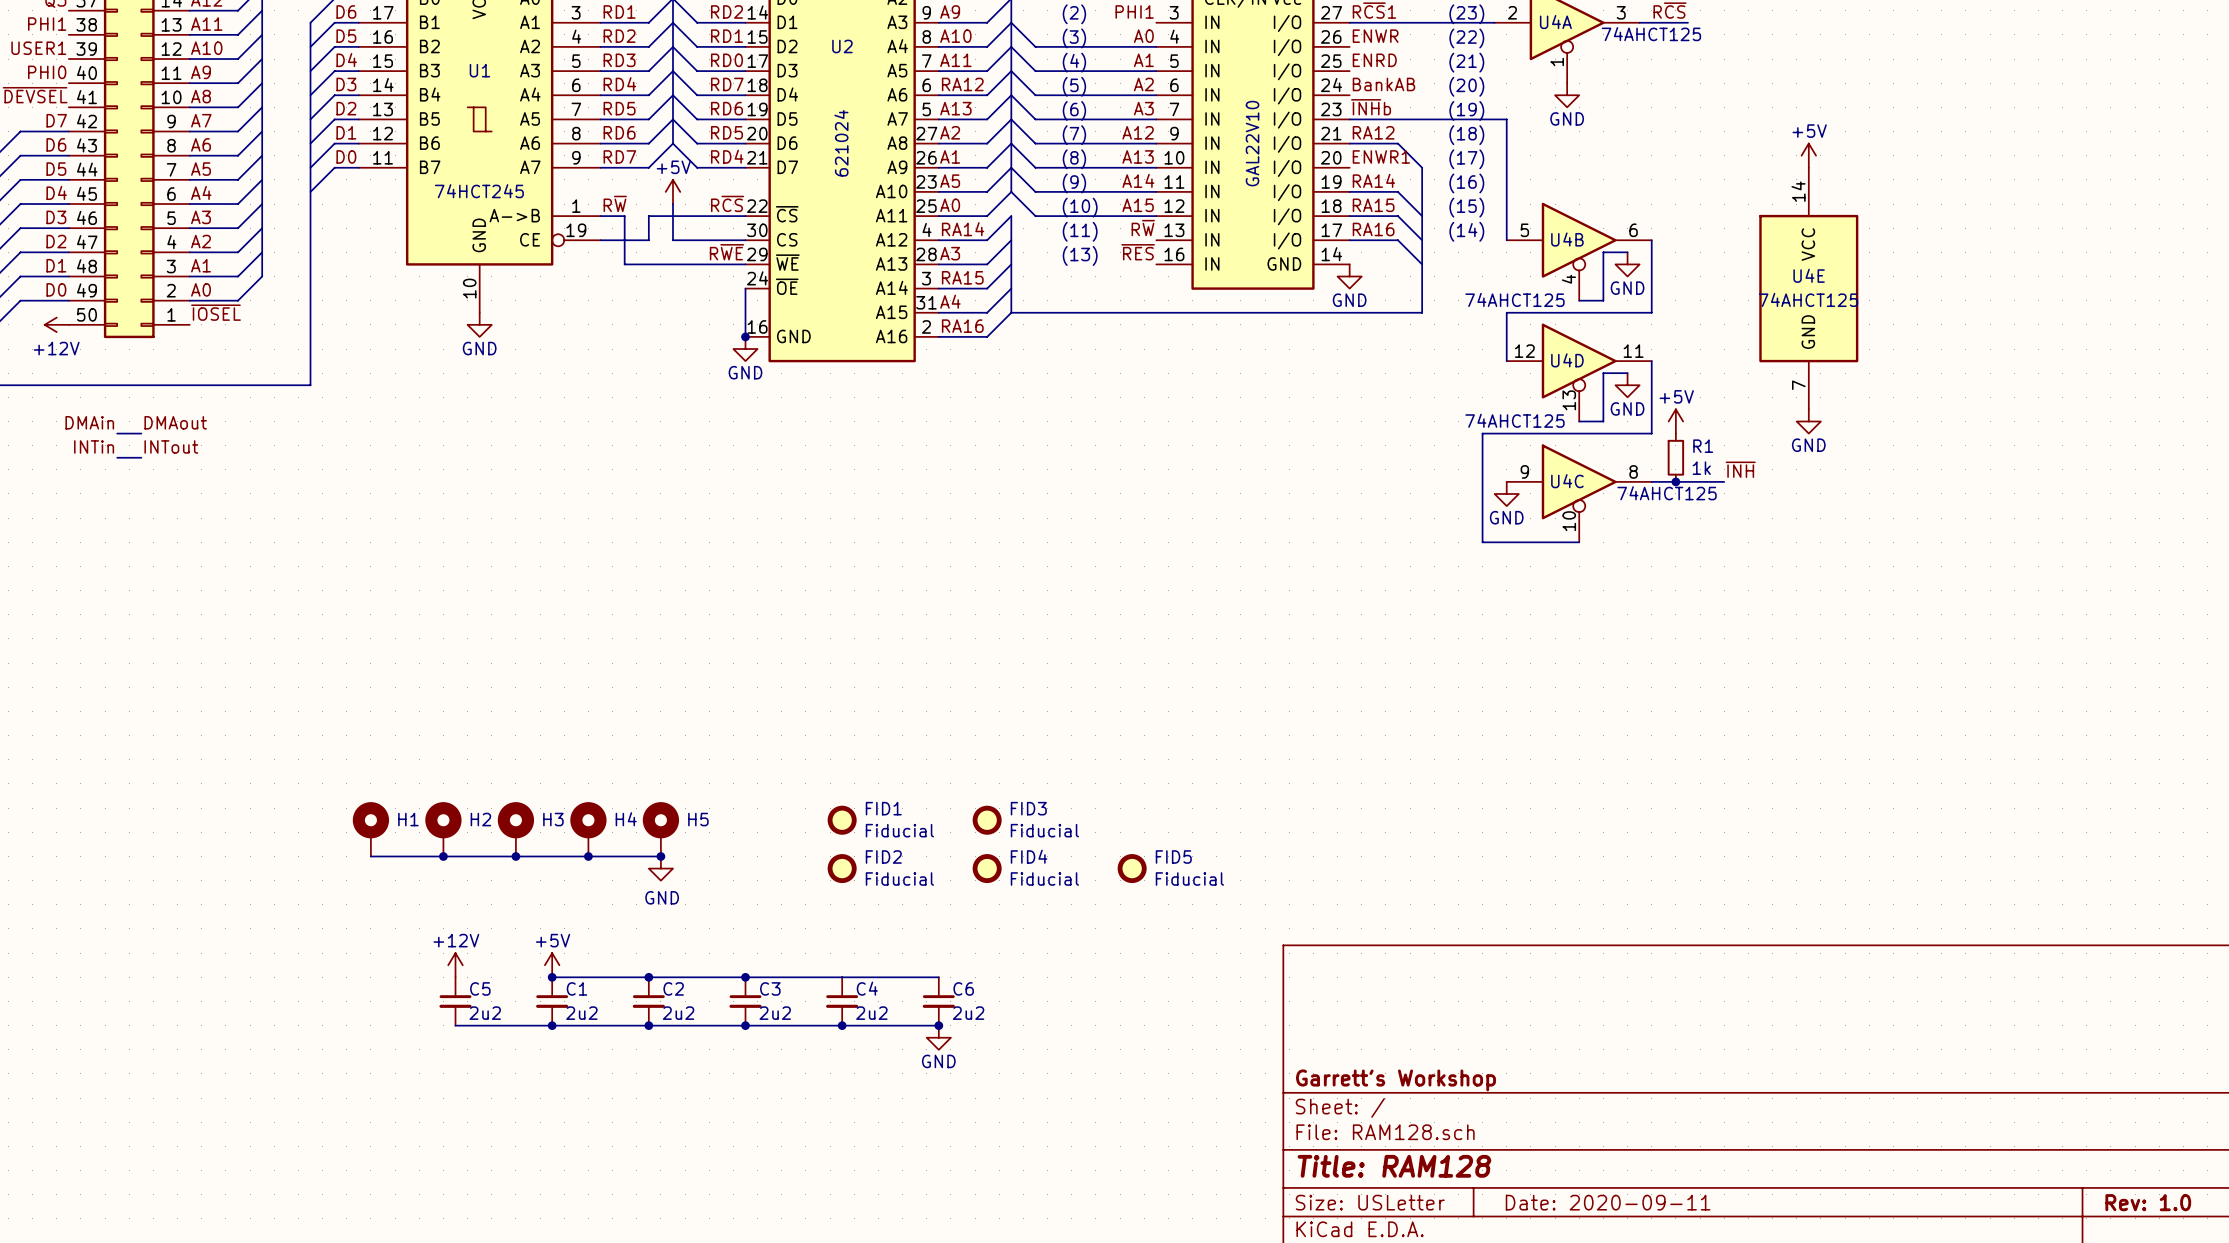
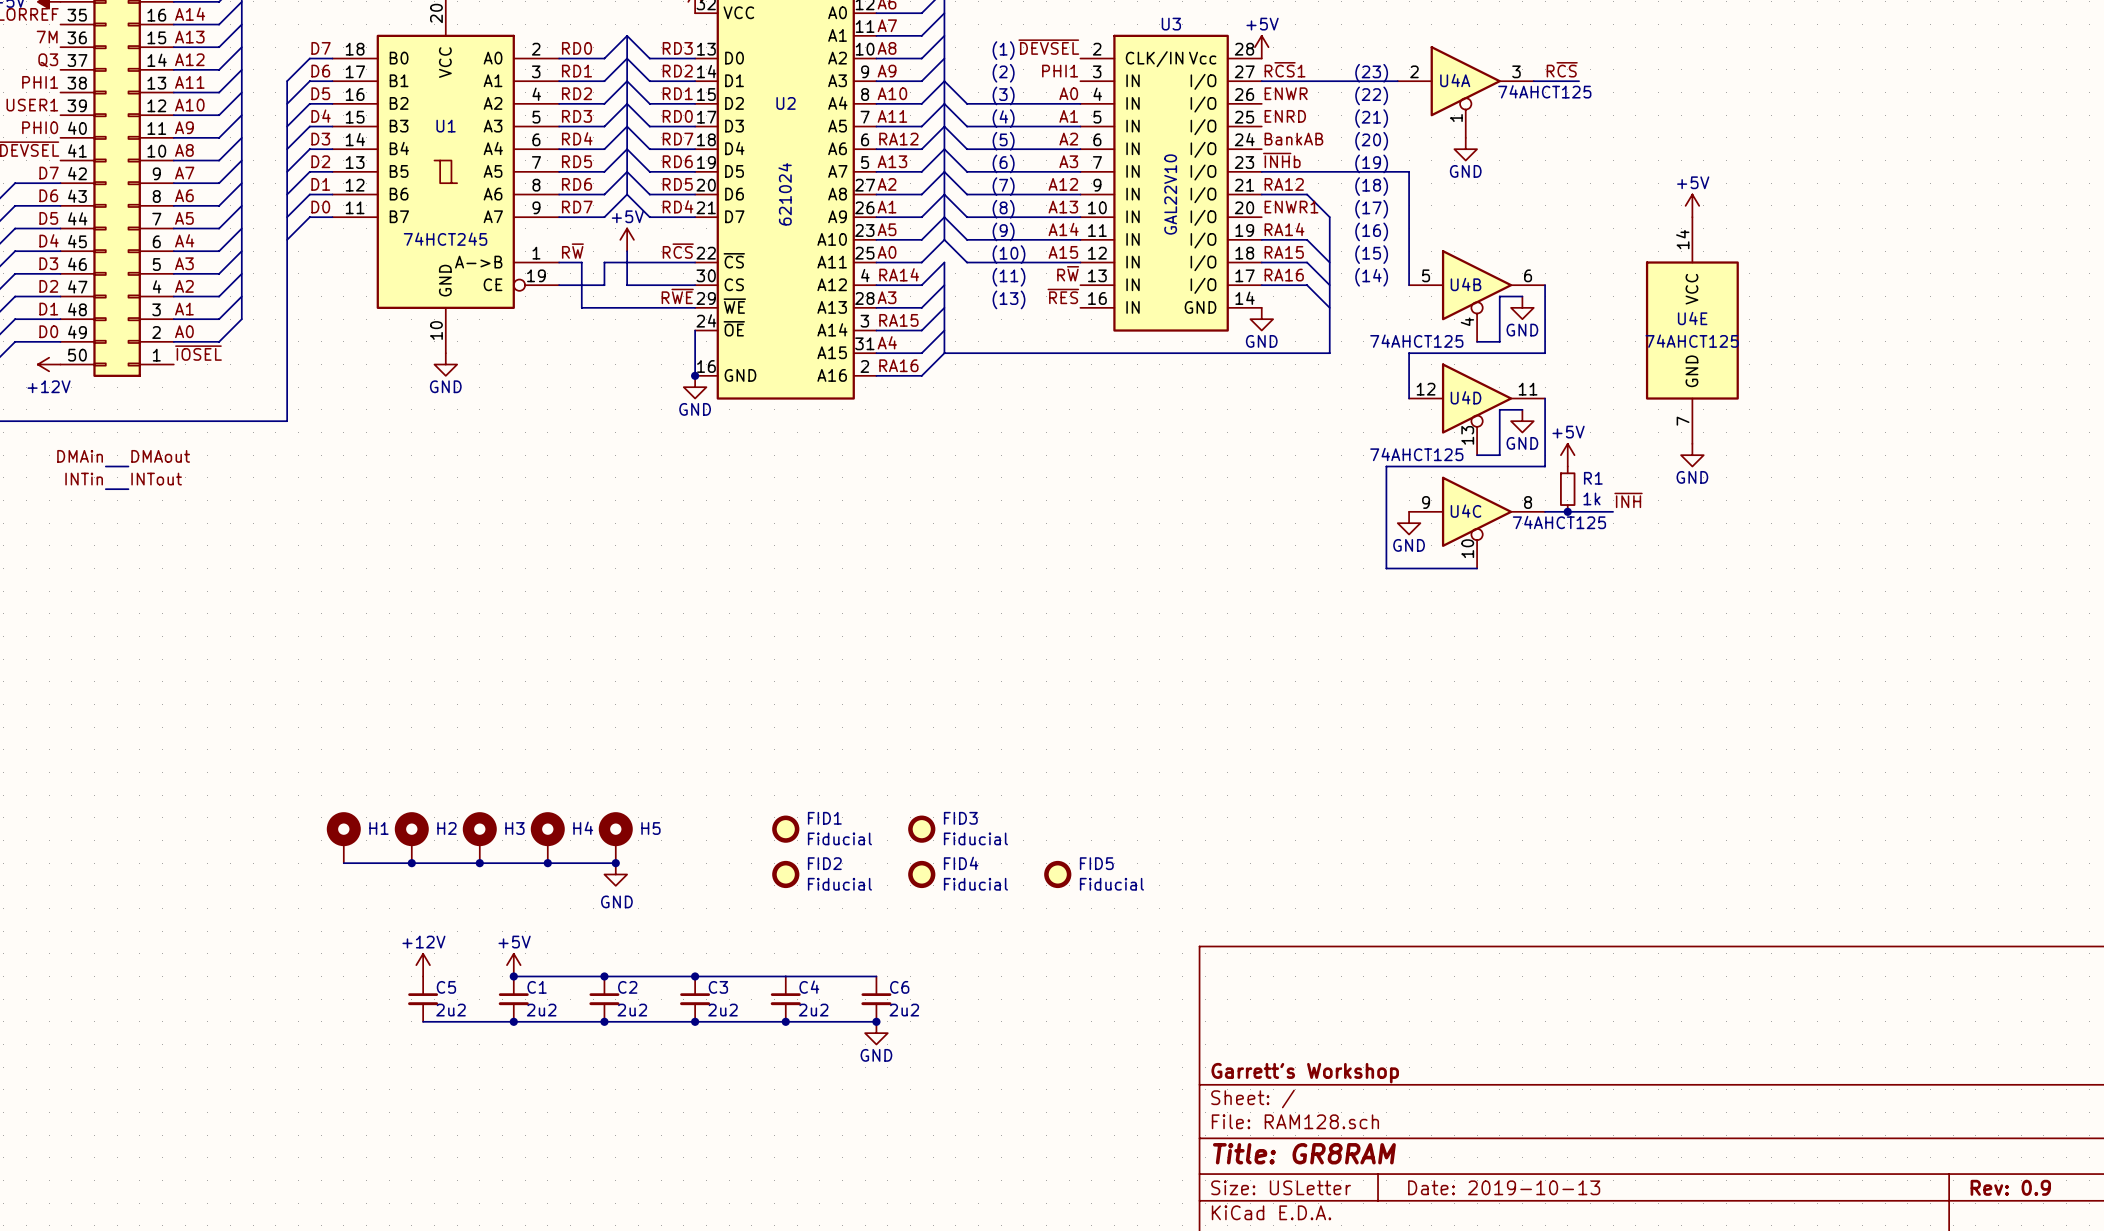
title block: Title: RAM128 (1394, 1166) -> Title: GR8RAM (1304, 1153)
title block: Date: 2020-09-11 (1608, 1202) -> Date: 2019-10-13 (1504, 1187)
title block: Rev: 1.0 (2148, 1202) -> Rev: 0.9 (2010, 1187)

